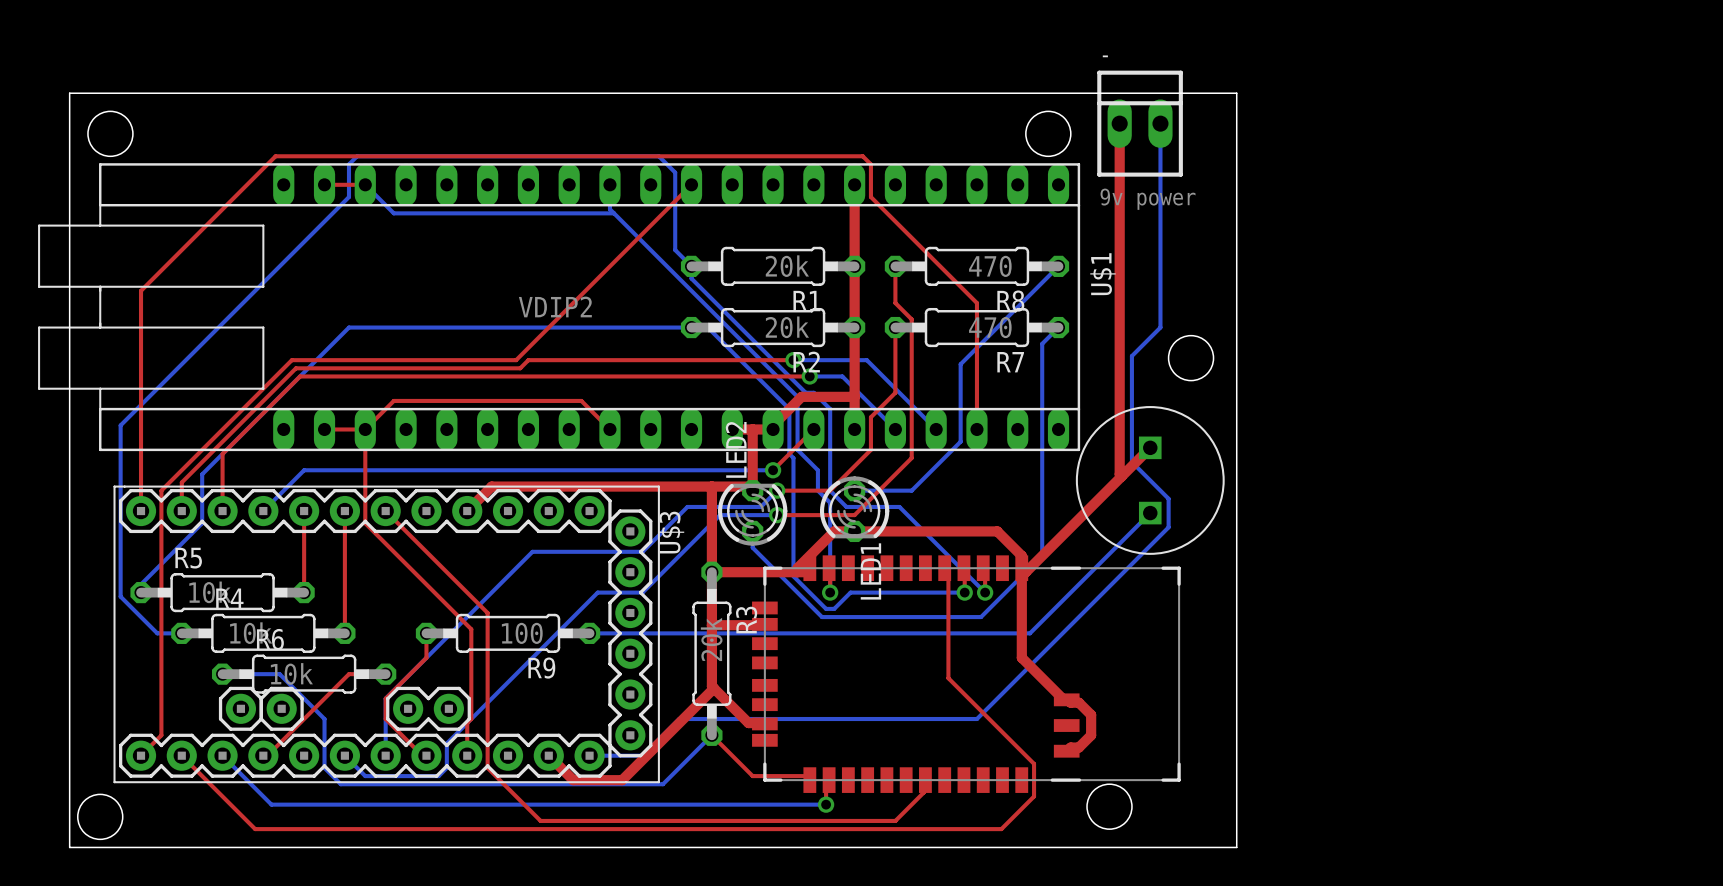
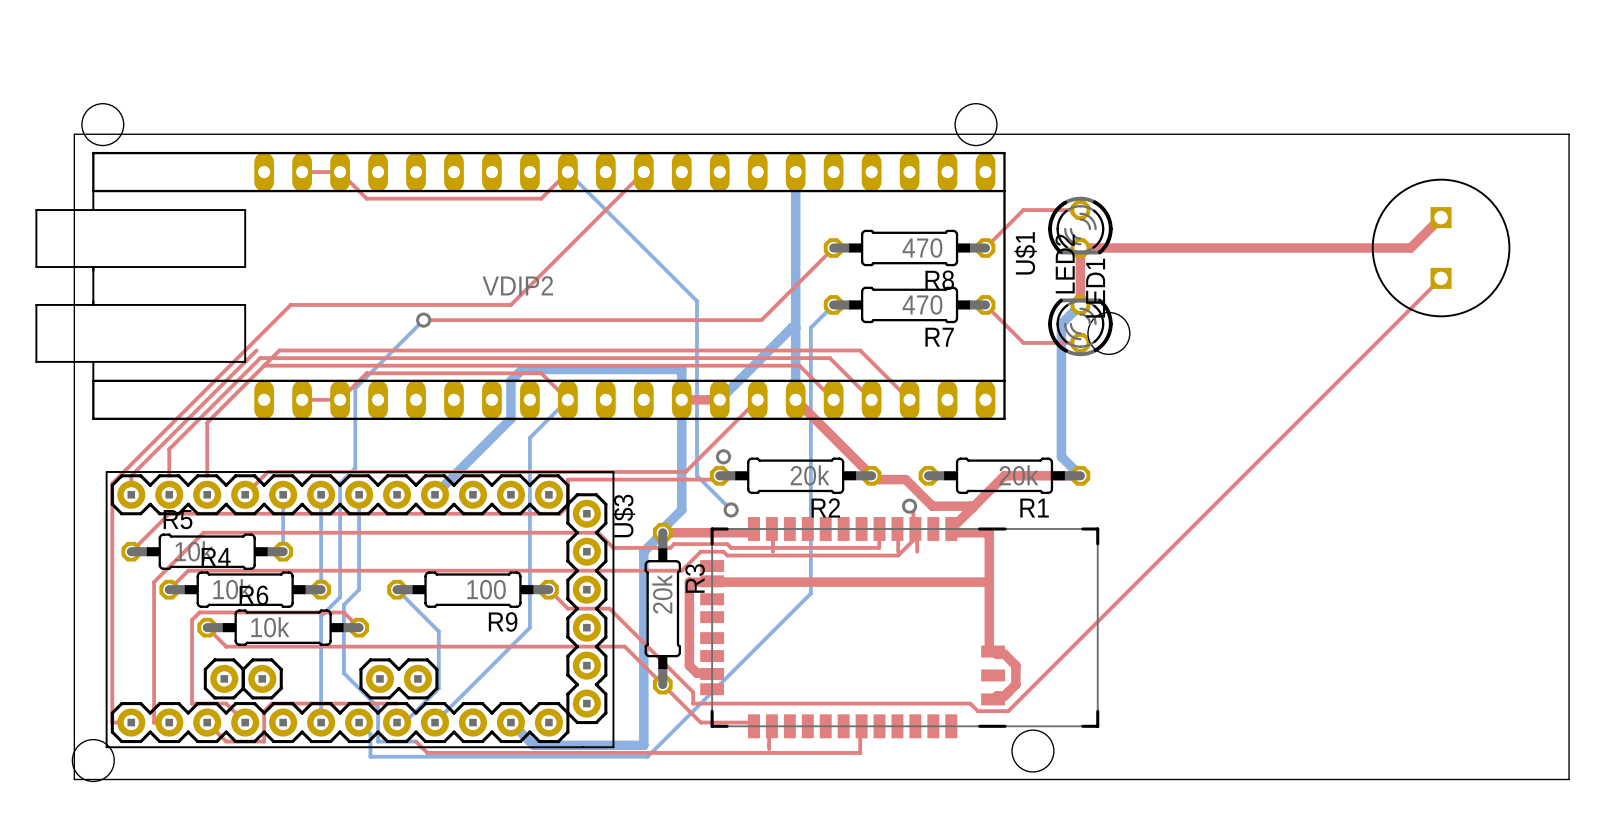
board edge: (69, 93) (1236, 93) (1236, 847) (69, 847) (69, 93) -> (74, 134) (74, 779) (1569, 779) (1569, 134) (74, 134)
top track: (1119, 123) (1119, 474) (1121, 476) -> none
part: 9v power (1140, 123) -> none
bottom track: (1160, 123) (1160, 327) -> none
top track: none -> (340, 172) (366, 198) (541, 198) (567, 172)
bottom track: (365, 184) (393, 213) (614, 213) -> none
bottom track: (609, 184) (609, 209) (797, 396) (797, 449) (817, 470) (817, 490) (830, 502) (830, 592) -> (567, 172) (628, 232)
top track: (854, 184) (854, 429) -> (972, 508) (970, 506) (932, 506) (905, 479) (879, 479) (875, 475) (871, 475) (795, 399)
bottom track: none -> (795, 172) (795, 399)
top track: none -> (1080, 210) (1023, 210) (985, 248)
top track: none -> (1441, 217) (1410, 248) (1080, 248) (1080, 304)
bottom track: (675, 250) (675, 172) (658, 156) (357, 156) (348, 164) (348, 197) (120, 425) (120, 596) (157, 633) (181, 633) -> none
bottom track: (691, 266) (691, 278) (805, 392) (813, 392) (830, 409) (830, 490) (846, 506) (899, 506) (985, 592) -> (643, 248) (696, 301) (696, 475) (731, 509)
R1 position: (773, 266) -> (1004, 475)
top track: (895, 266) (895, 303) (911, 319) (911, 458) (854, 515) (777, 515) -> (833, 248) (761, 320) (423, 320)
bottom track: (1058, 266) (960, 364) (960, 441) (911, 490) (854, 490) -> none
part: none -> (1441, 248)
top track: none -> (1441, 278) (1008, 711) (977, 711) (970, 703) (693, 703) (693, 692) (609, 608) (567, 608) (548, 589)
top track: (548, 327) (516, 360) (291, 360) (275, 376) -> (510, 304) (290, 304) (112, 483) (112, 722) (131, 722)
R2 position: (773, 327) -> (795, 475)
top track: (895, 327) (895, 392) (870, 417) (870, 449) (830, 490) (777, 490) -> none
bottom track: none -> (833, 304) (810, 327) (810, 593) (647, 756) (370, 756) (370, 733) (359, 722)
top track: none -> (985, 304) (1023, 342) (1080, 342)
bottom track: (1058, 327) (1042, 343) (1042, 555) (981, 617) (822, 617) (752, 547) (752, 531) -> none
bottom track width: thin (1160, 327) (1140, 347) -> thick (1080, 304) (1061, 323)
bottom track: none -> (423, 320) (355, 388) (355, 468) (340, 483) (340, 597) (321, 616) (321, 722)
via: none -> (423, 320)
bottom track: (1140, 347) (1131, 356) (1131, 462) (1168, 498) (1168, 527) (976, 719) (679, 719) (642, 755) (589, 755) -> (1061, 323) (1061, 456) (1080, 475)
bottom track: none -> (795, 327) (791, 327) (719, 399)
top track: (793, 360) (528, 360) (520, 368) (295, 368) (279, 384) -> (871, 399) (829, 358) (260, 358)
bottom track: (793, 360) (866, 360) (936, 429) -> none
via: (793, 360) -> none
bottom track: (809, 376) (842, 376) (895, 429) -> none
via: (809, 376) -> none
top track: none -> (264, 365) (799, 365) (833, 399)
top track: (854, 396) (801, 396) (773, 425) (773, 429) -> none
top track: (365, 429) (365, 523) (471, 629) (471, 719) (467, 723) (467, 755) -> none
bottom track: none -> (567, 399) (529, 437) (529, 627) (435, 722)
top track: (752, 429) (752, 490) (748, 486) (491, 486) (467, 511) -> none
top track: (976, 429) (976, 303) (870, 197) (870, 164) (862, 156) (275, 156) (141, 290) (141, 511) -> (909, 399) (860, 350) (753, 350)
top track: (1150, 447) (1025, 572) (1021, 568) (1021, 555) (997, 531) (834, 531) (797, 568) (797, 572) -> none
top track: none -> (719, 437) (685, 471) (267, 471) (245, 494)
bottom track: (773, 470) (304, 470) (263, 511) -> none
via: (773, 470) -> none
part: (1150, 480) -> none
top track: (711, 486) (711, 686) (740, 714) -> none
top track: (161, 490) (161, 735) (141, 755) -> (150, 456) (131, 475) (131, 494)
bottom track: (777, 490) (760, 506) (687, 506) (642, 551) (532, 551) (385, 698) (385, 755) -> none
LED1 position: (854, 509) -> (1080, 227)
top track: (304, 511) (304, 592) -> none
top track: (344, 511) (344, 633) -> none
top track: (385, 511) (487, 612) (487, 767) (540, 820) (895, 820) (923, 792) -> (416, 741) (427, 752) (860, 752) (860, 737)
top track: none -> (1080, 475) (1004, 475) (951, 529)
LED2 position: (752, 512) -> (1080, 325)
bottom track: (1150, 513) (1029, 633) (589, 633) -> none
top track: none -> (723, 479) (567, 479) (567, 506) (560, 513) (169, 513) (131, 551)
bottom track: (777, 515) (720, 515) (642, 592) (597, 592) (446, 743) (446, 767) (438, 776) (434, 776) -> (397, 589) (438, 631) (438, 688) (404, 722)
via: (777, 515) -> none
bottom track: none -> (283, 494) (283, 551)
bottom track: none -> (321, 494) (321, 589)
bottom track: none -> (359, 494) (359, 589) (343, 604) (343, 673) (378, 707) (378, 741) (416, 741)
bottom track: none -> (435, 494) (510, 418) (510, 380) (522, 369) (681, 369) (681, 509) (643, 551) (643, 745) (533, 745) (510, 722)
top track: none -> (909, 506) (913, 506) (913, 528) (915, 529) (913, 540) (898, 555) (727, 555) (723, 551) (700, 551) (681, 570) (188, 570) (169, 589)
via: none -> (909, 506)
via: none -> (731, 509)
top track: (944, 568) (948, 572) (948, 678) (1034, 763) (1034, 796) (1001, 829) (255, 829) (181, 755) -> (879, 529) (879, 547) (731, 547) (727, 544) (674, 544) (670, 547) (613, 547) (598, 532) (203, 532) (154, 582) (154, 722) (169, 722)
top track: (1021, 572) (1021, 657) (1062, 698) -> (951, 532) (989, 532) (989, 650)
bottom track: (141, 592) (141, 584) (202, 523) (202, 474) (348, 327) (707, 327) (789, 409) (789, 453) (793, 458) (793, 576) (826, 608) (834, 608) (850, 592) (964, 592) -> none
via: (830, 592) -> none
via: (964, 592) -> none
via: (985, 592) -> none
top track: none -> (712, 581) (989, 582)
top track: (711, 625) (740, 625) -> (689, 665) (689, 582)
top track: (426, 633) (426, 657) (385, 698) (385, 719) (422, 755) -> (207, 722) (226, 741) (264, 741) (264, 711) (271, 703) (393, 703)
U$3 position: (386, 634) -> (360, 609)
top track: none -> (207, 627) (226, 646) (624, 646) (662, 684)
bottom track: (222, 674) (279, 674) (324, 719) (324, 767) (340, 784) (662, 784) (711, 735) -> none
top track: (385, 674) (348, 674) (267, 755) (263, 755) -> (359, 627) (343, 612) (199, 612) (192, 620) (192, 703) (226, 703) (245, 722)
top track: (713, 688) (622, 780) (573, 780) (548, 755) -> none
bottom track: (222, 755) (271, 804) (826, 804) -> none
bottom track: (344, 755) (365, 776) (426, 776) -> none
via: (826, 804) -> none

